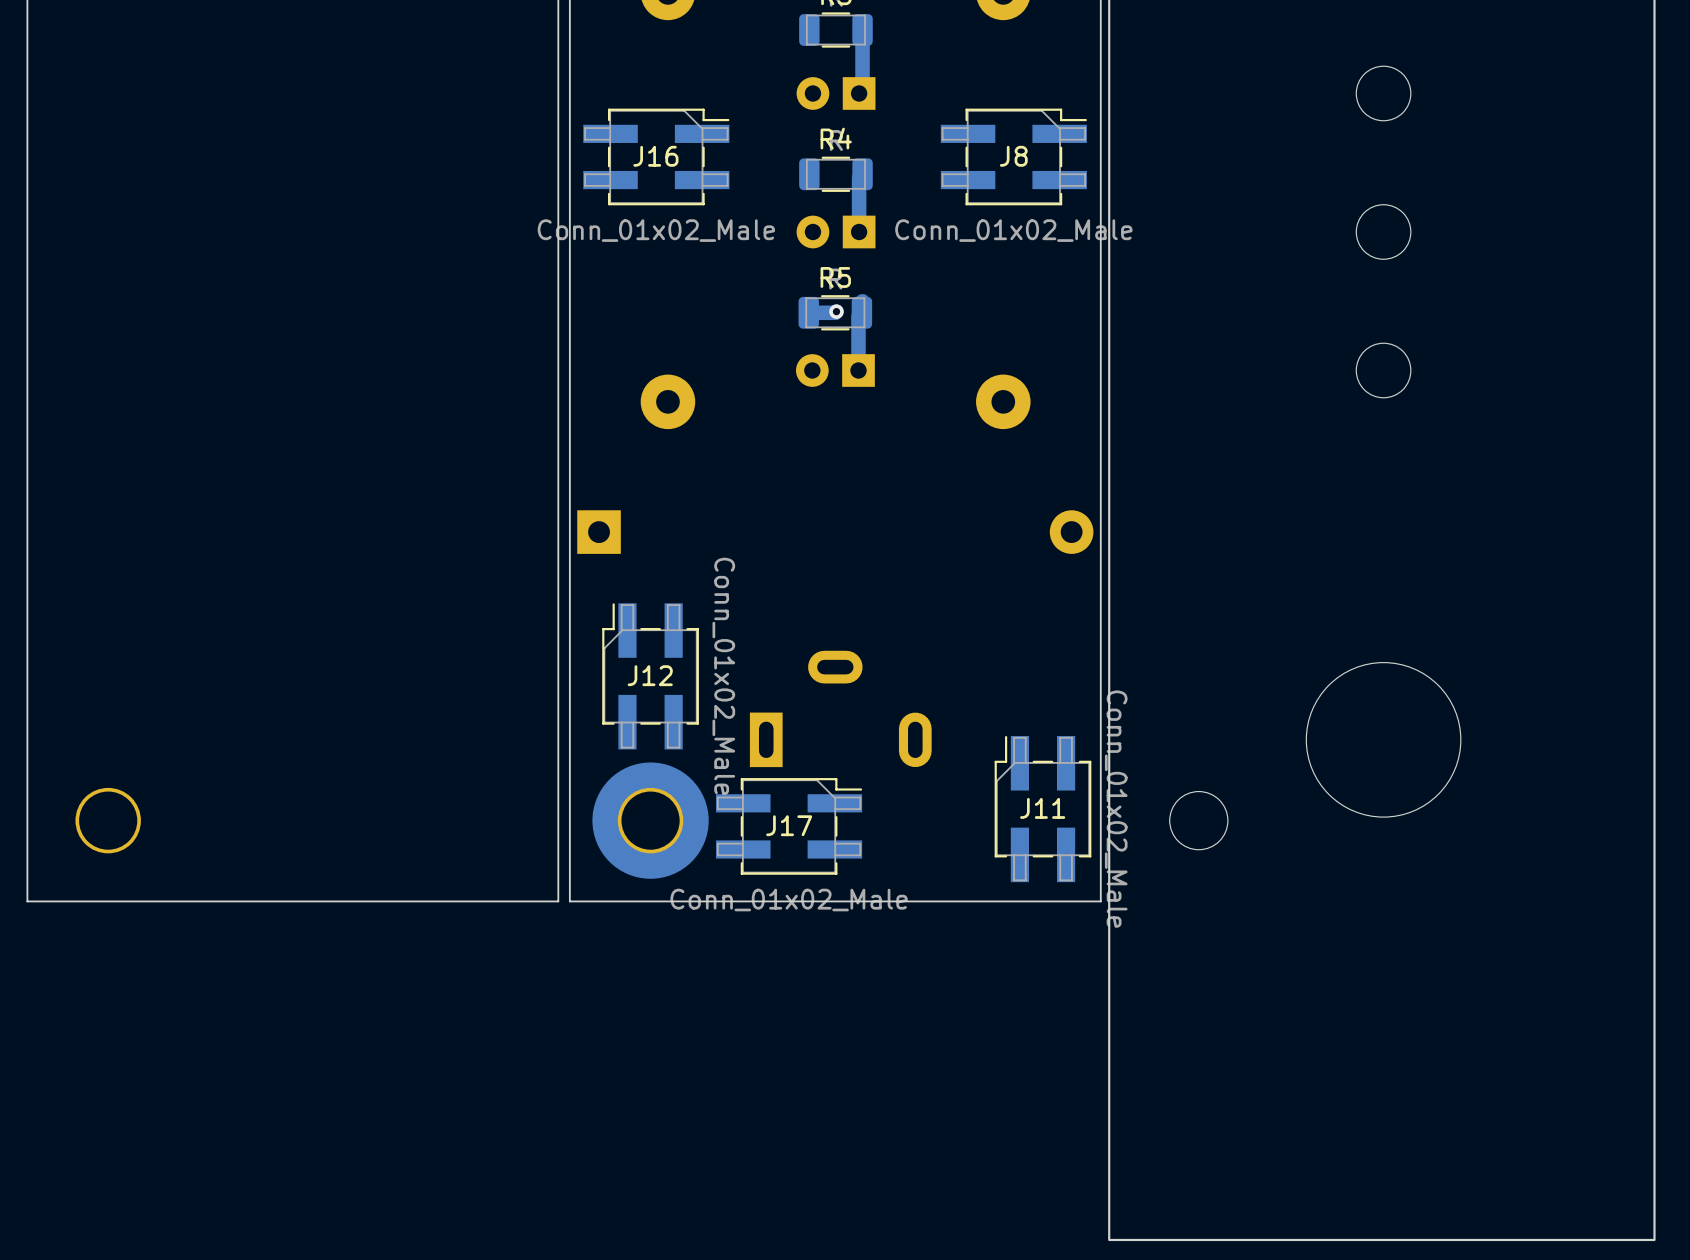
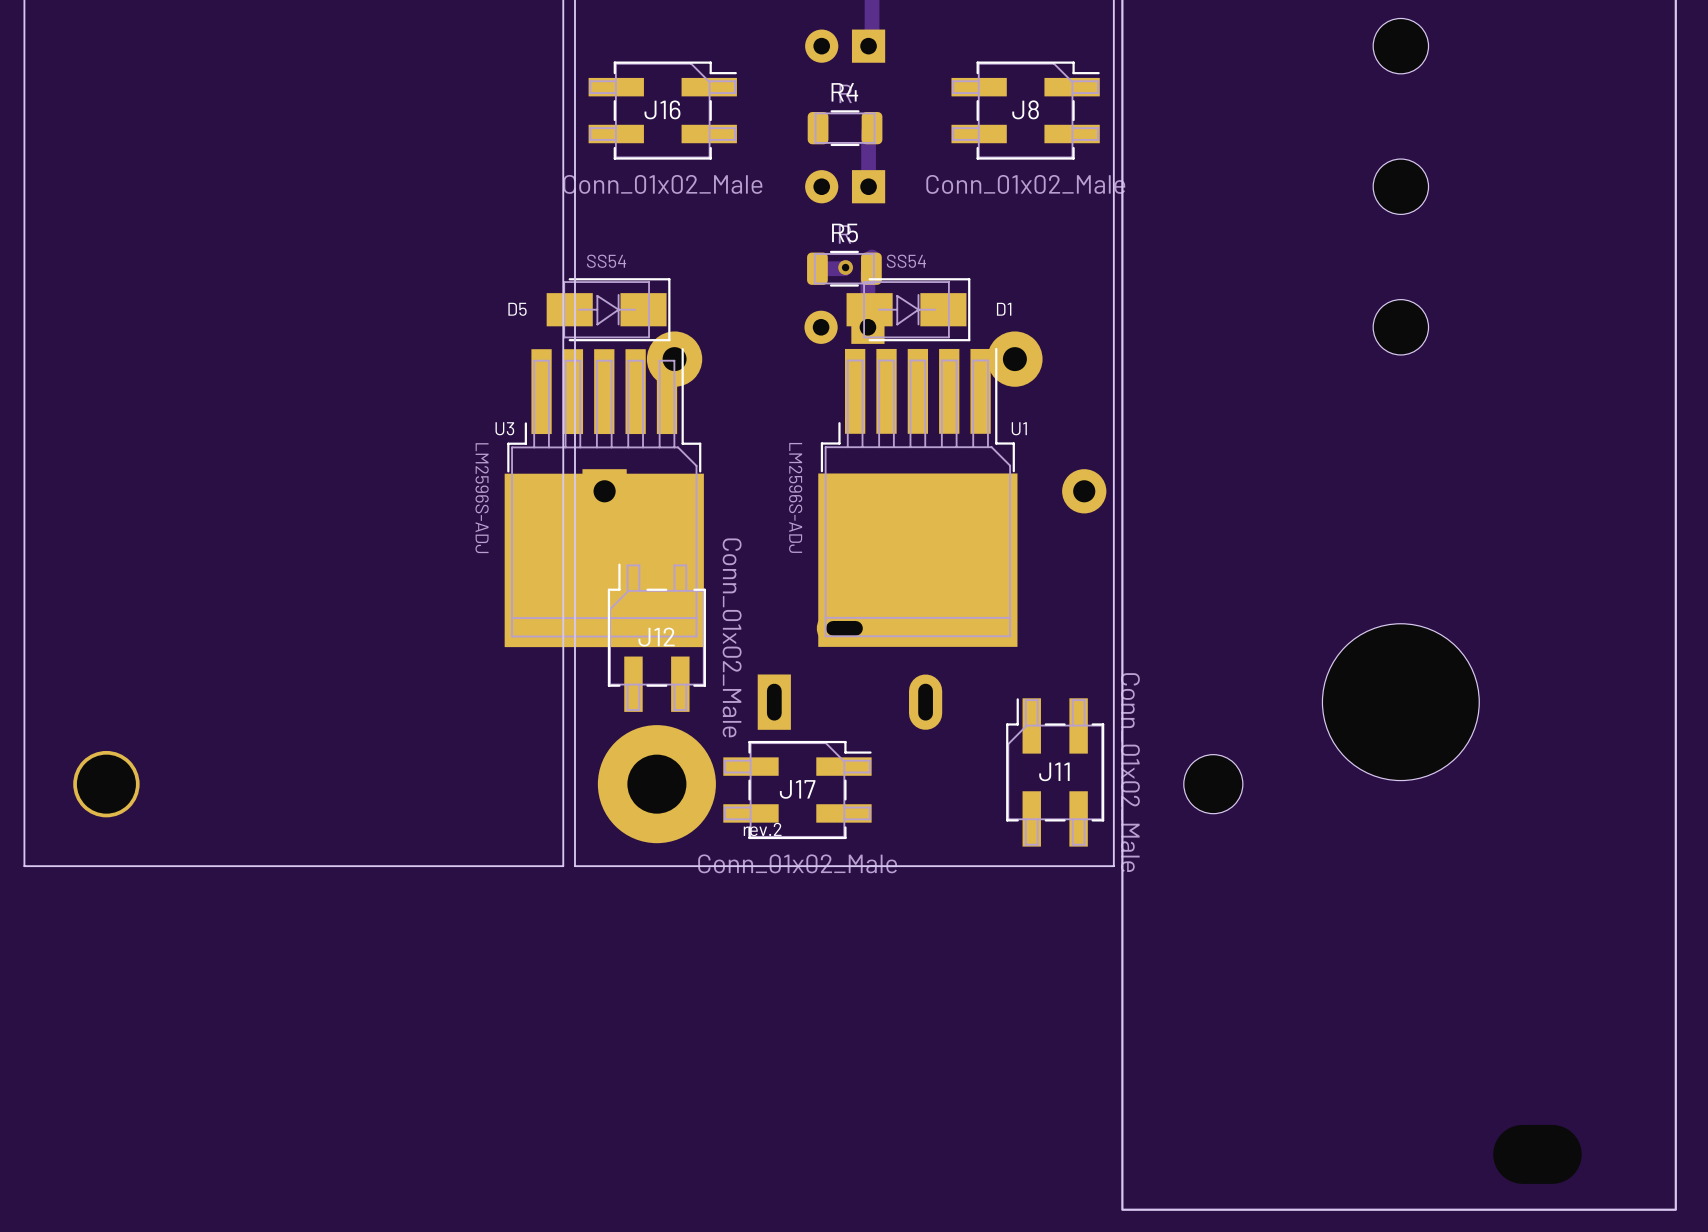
D5: none -> SS54 (608, 309)
D1: none -> SS54 (908, 309)
U3: none -> LM2596S-ADJ (604, 497)
U1: none -> LM2596S-ADJ (917, 497)
text: none -> rev.2 (762, 829)

